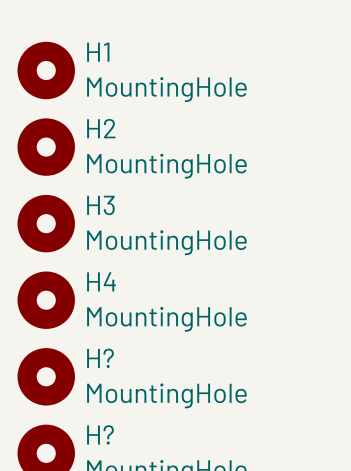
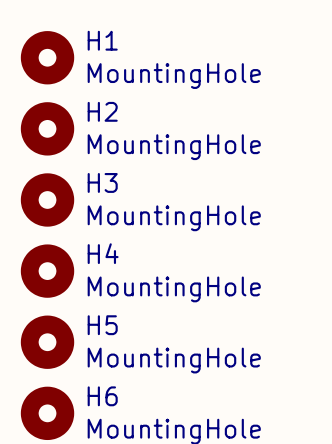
H? name: H? (100, 358) -> H5 (102, 325)
H? name: H? (100, 434) -> H6 (102, 396)

